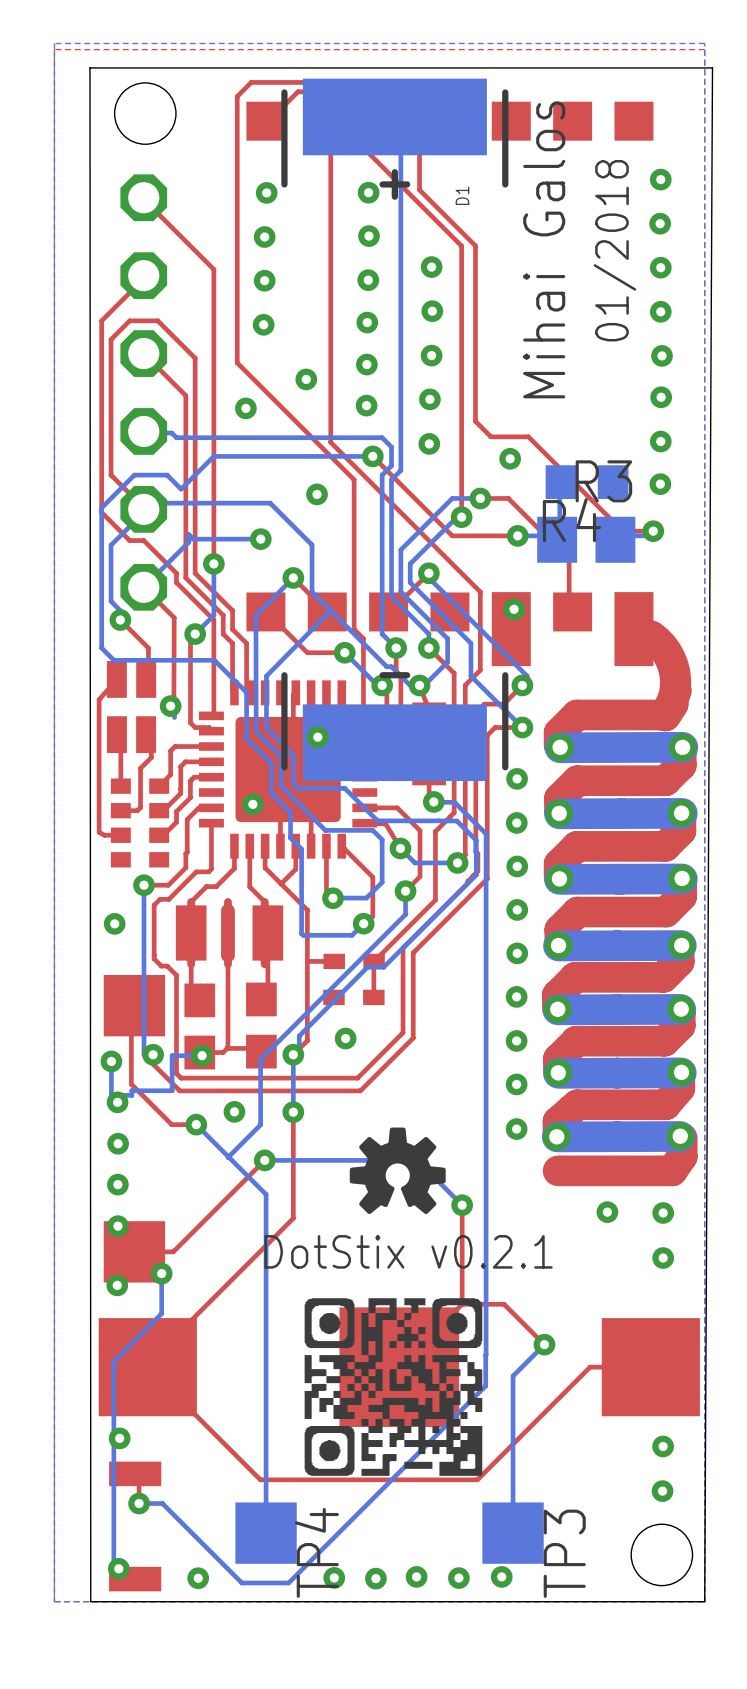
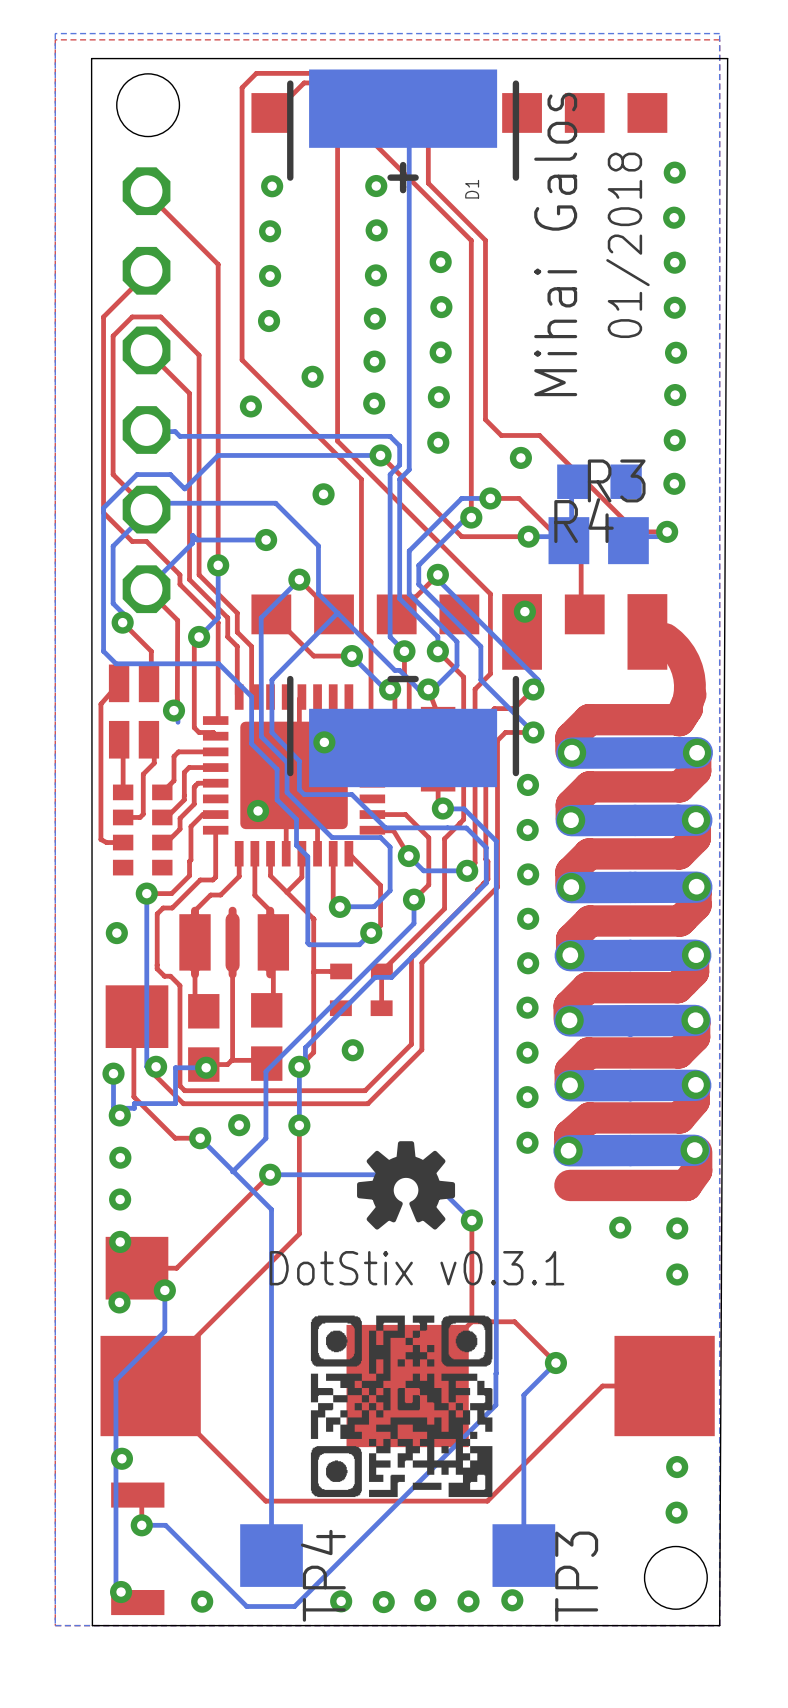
text: DotStix v0.2.1 (408, 1251) -> DotStix v0.3.1 (417, 1268)

